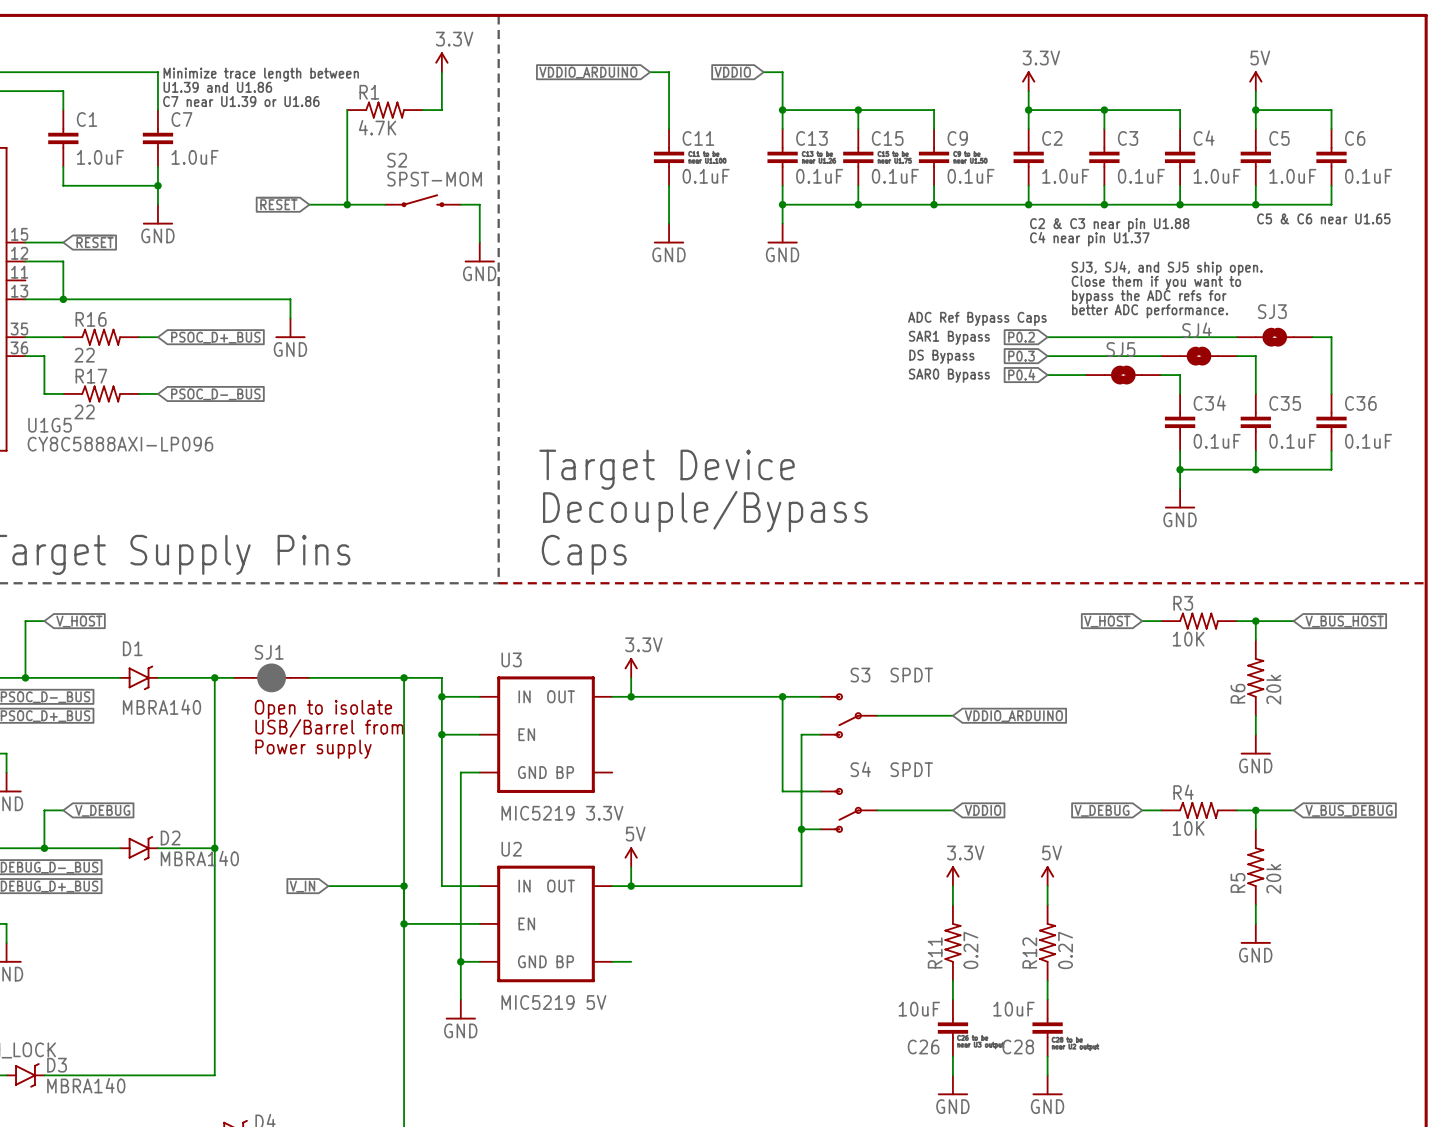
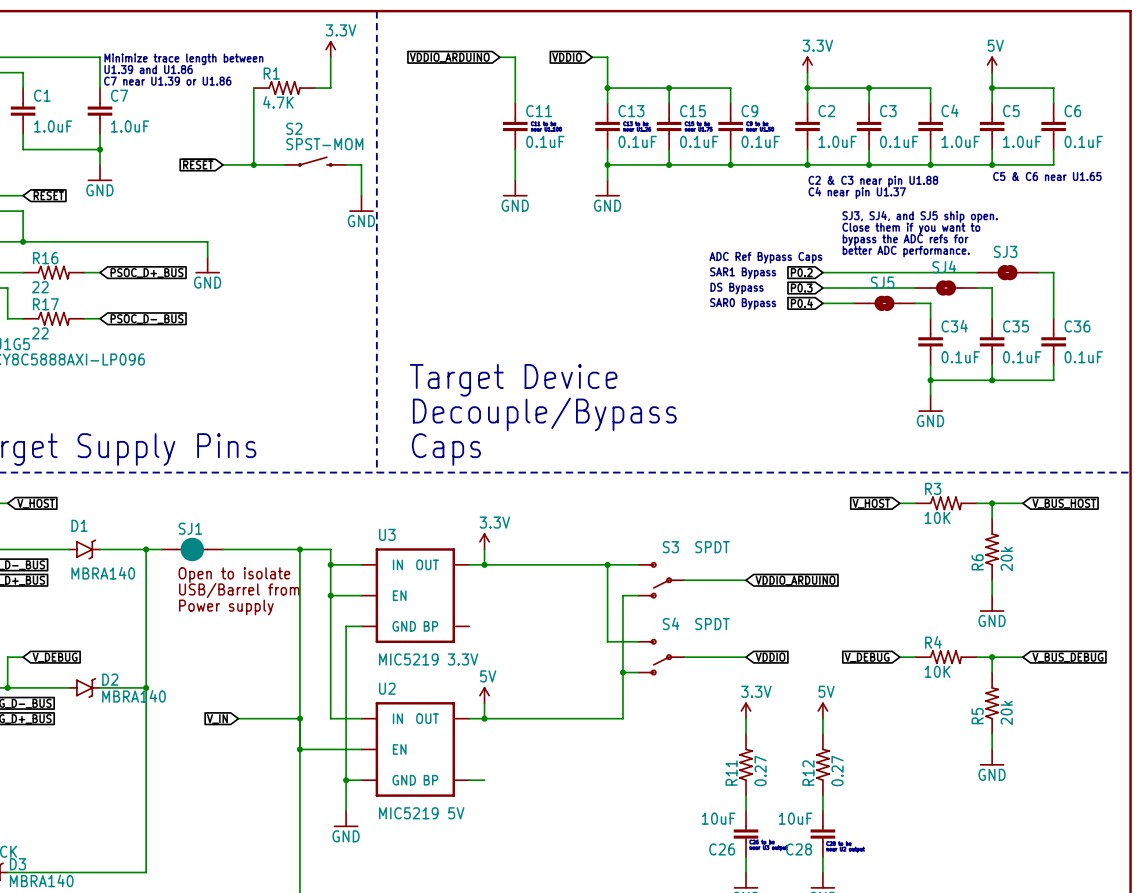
line: none -> (376, 472) (1130, 472)
line: (498, 583) (1426, 583) -> none

